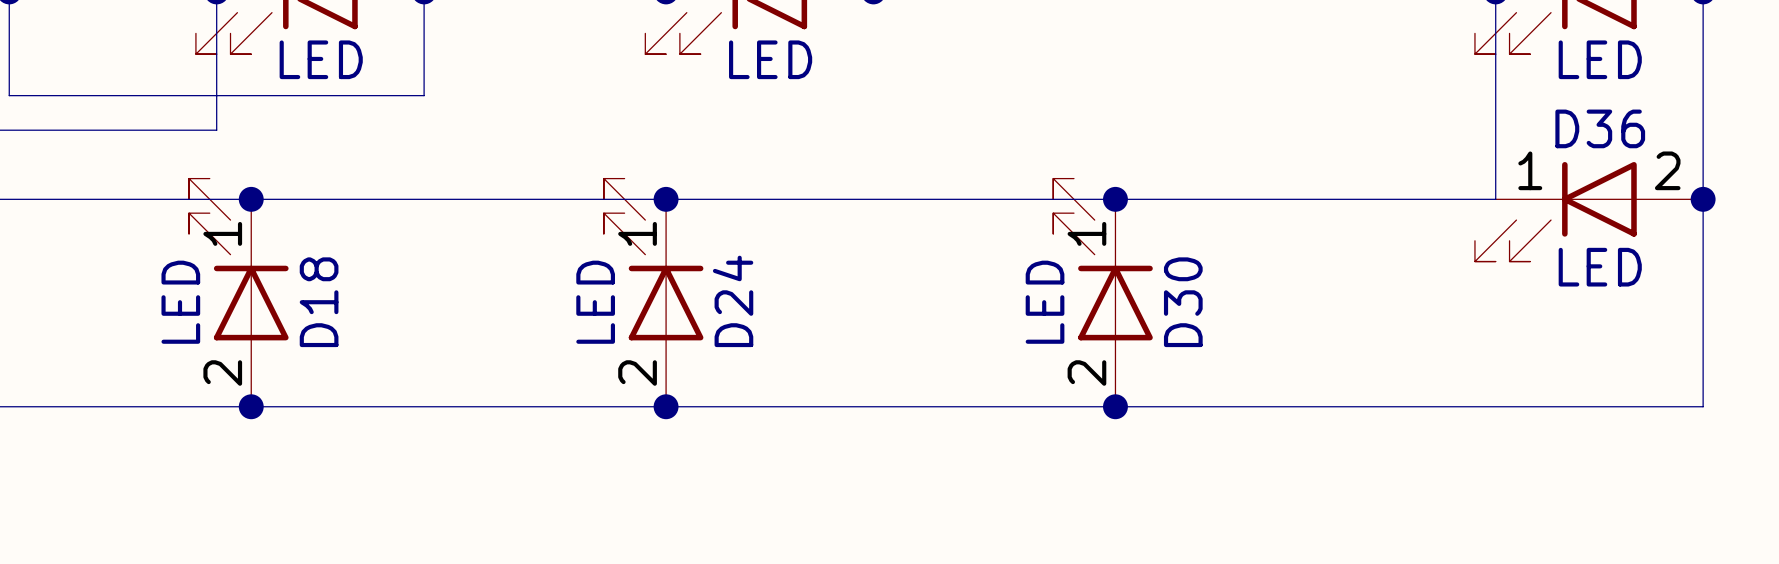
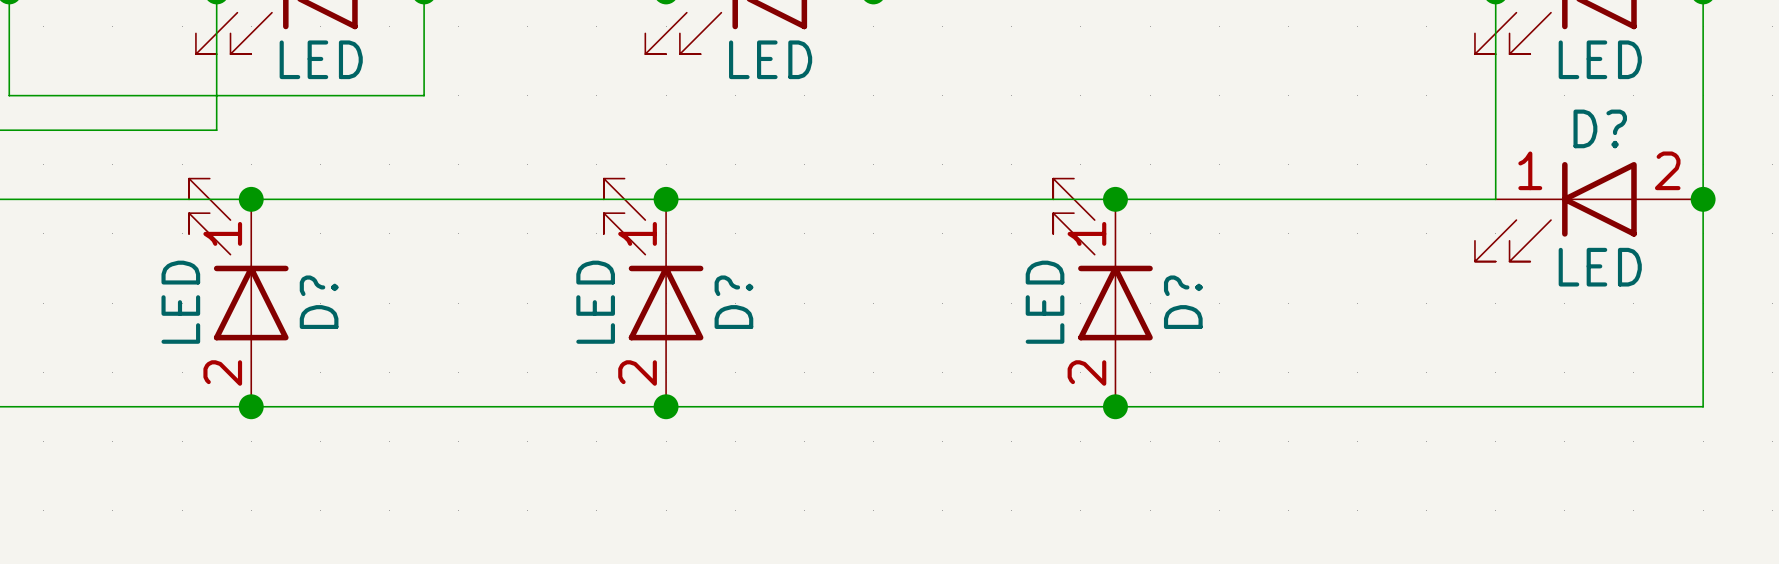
D36 name: D36 (1600, 128) -> D? (1600, 128)
D24 name: D24 (733, 301) -> D? (733, 302)
D18 name: D18 (319, 302) -> D? (319, 302)
D30 name: D30 (1183, 302) -> D? (1183, 302)

